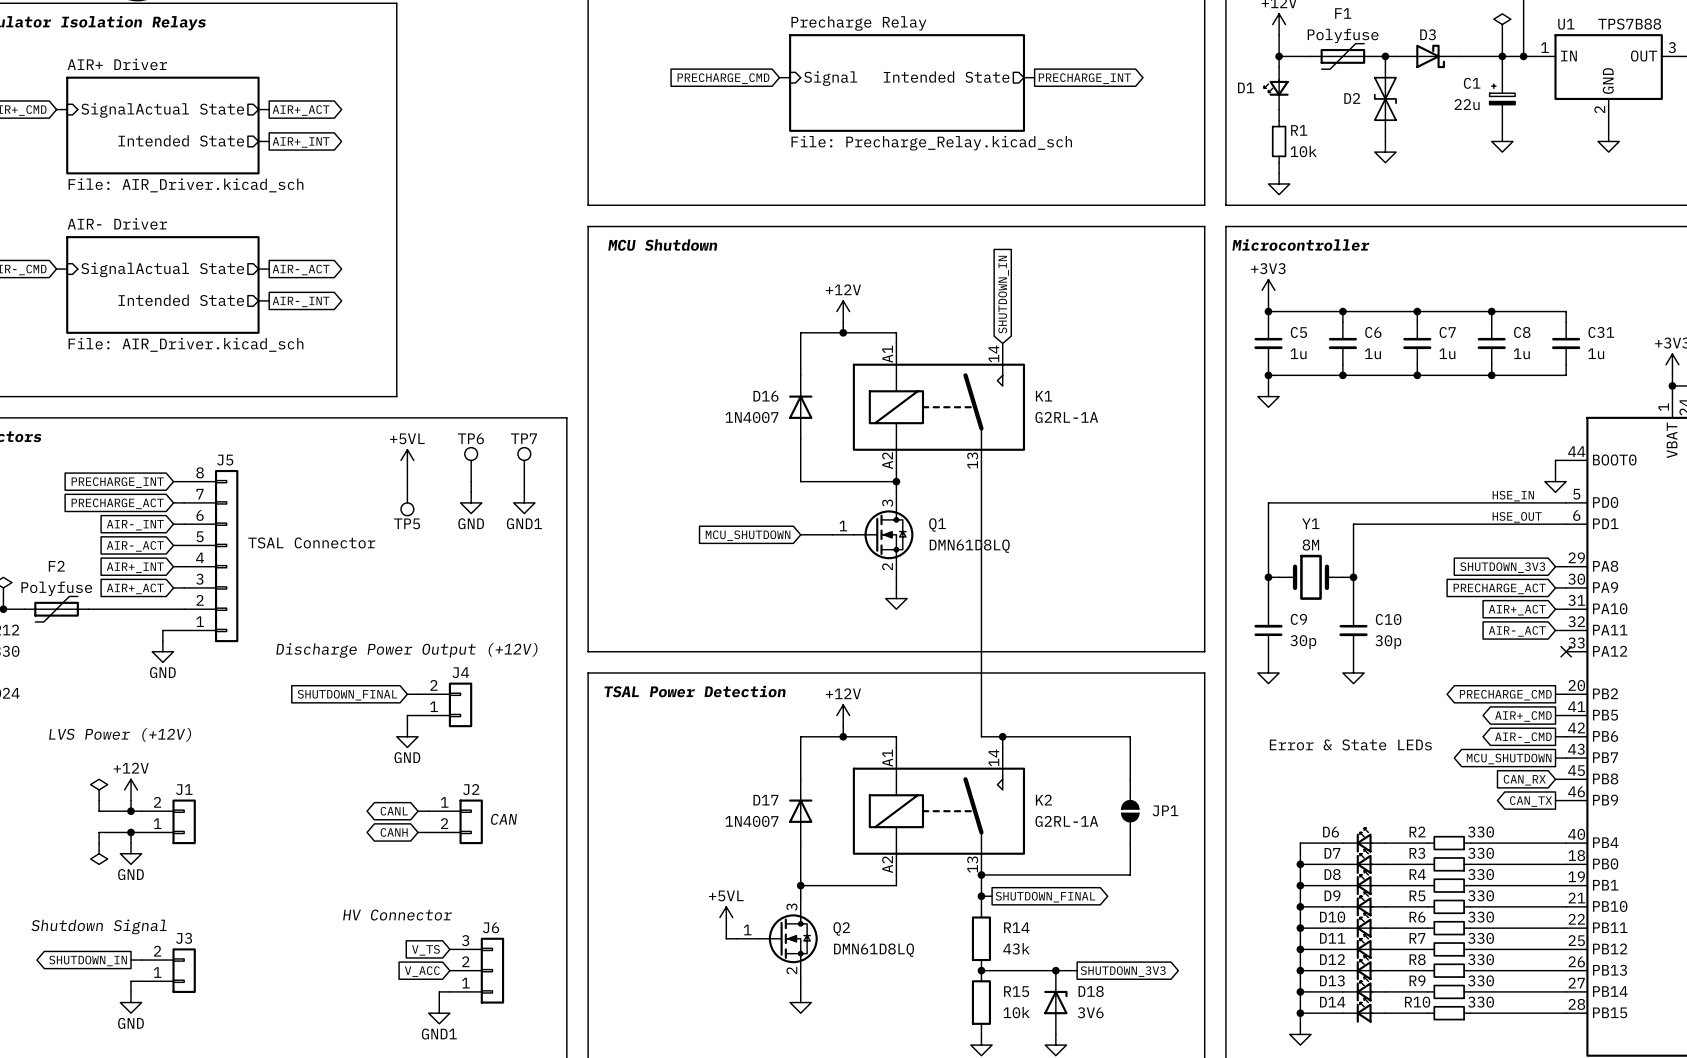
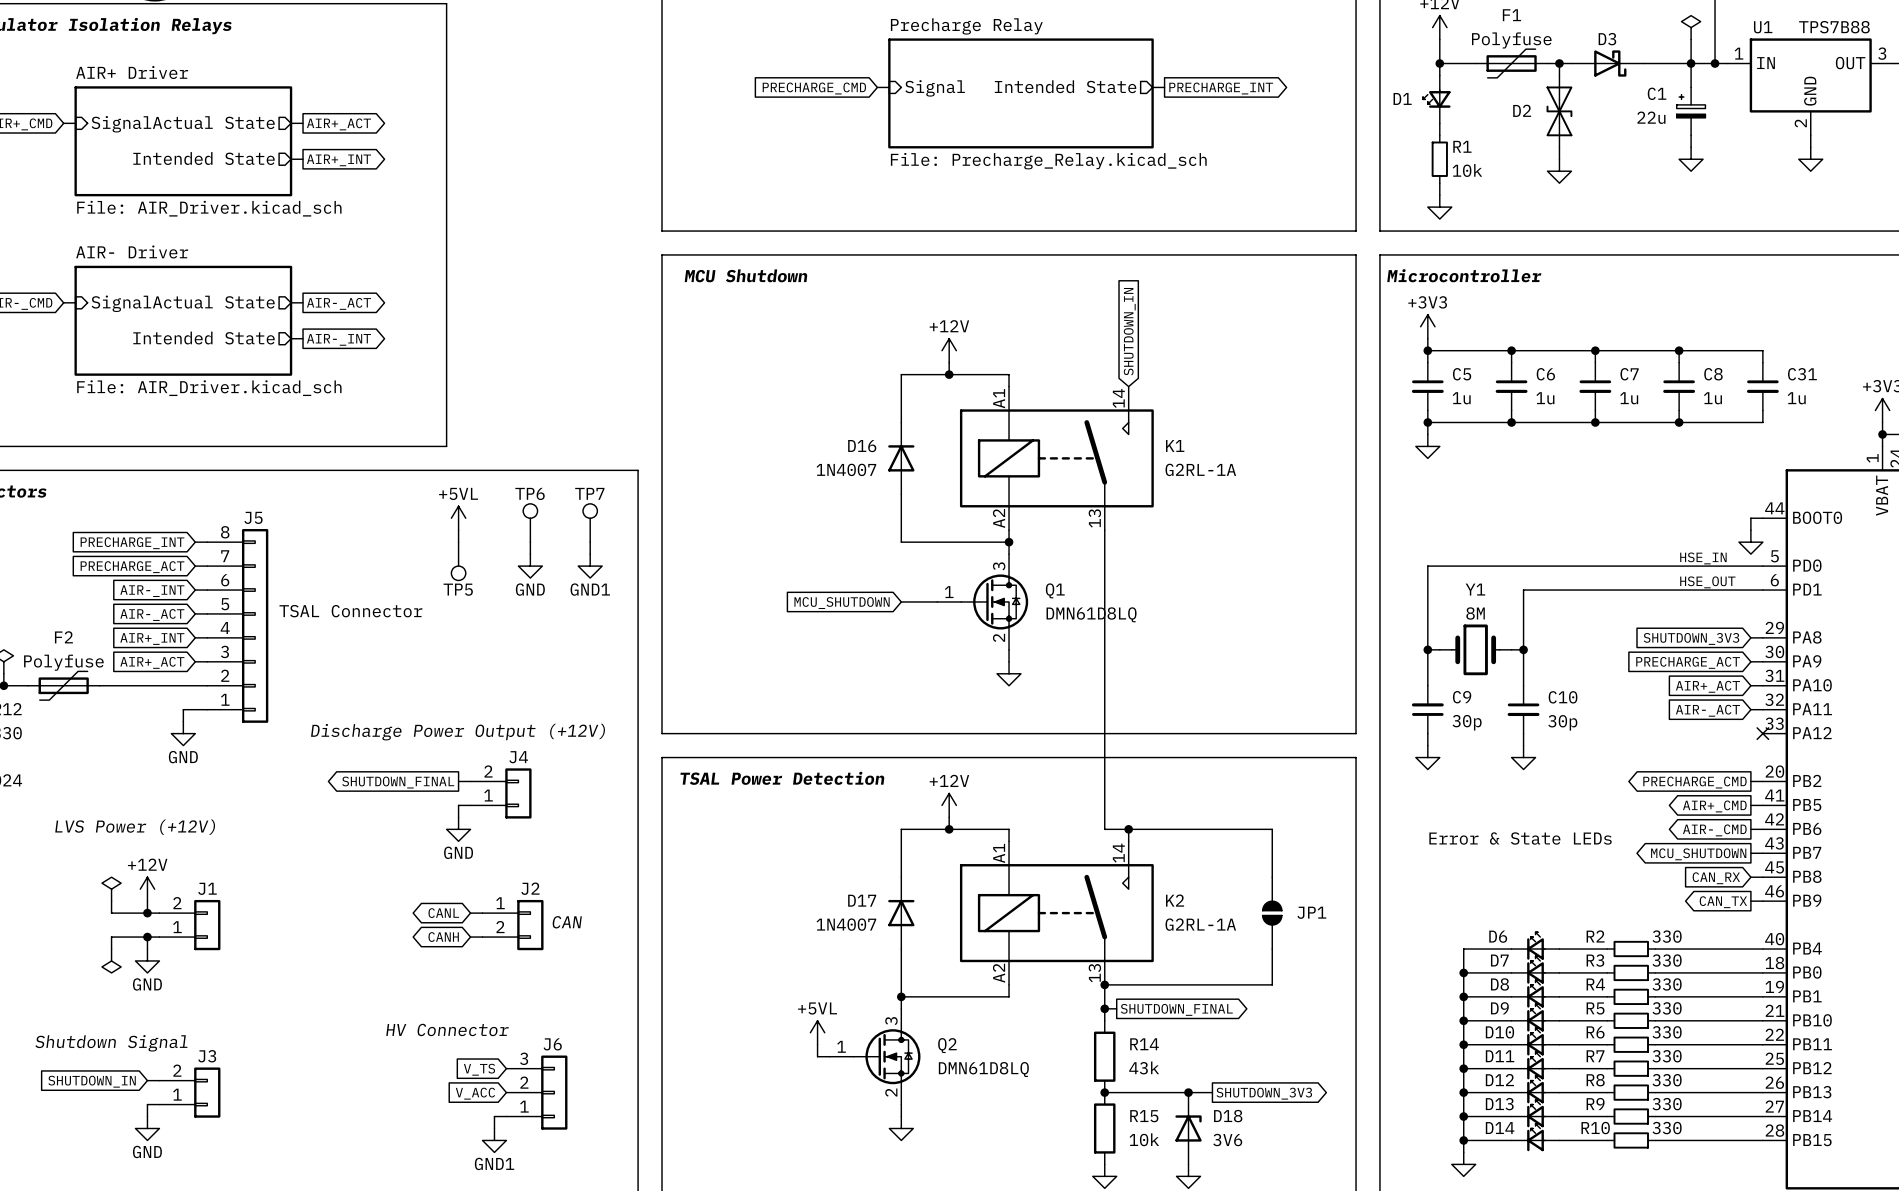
global label shape: input (347, 695) -> output (398, 782)
global label shape: output (88, 960) -> input (92, 1081)

